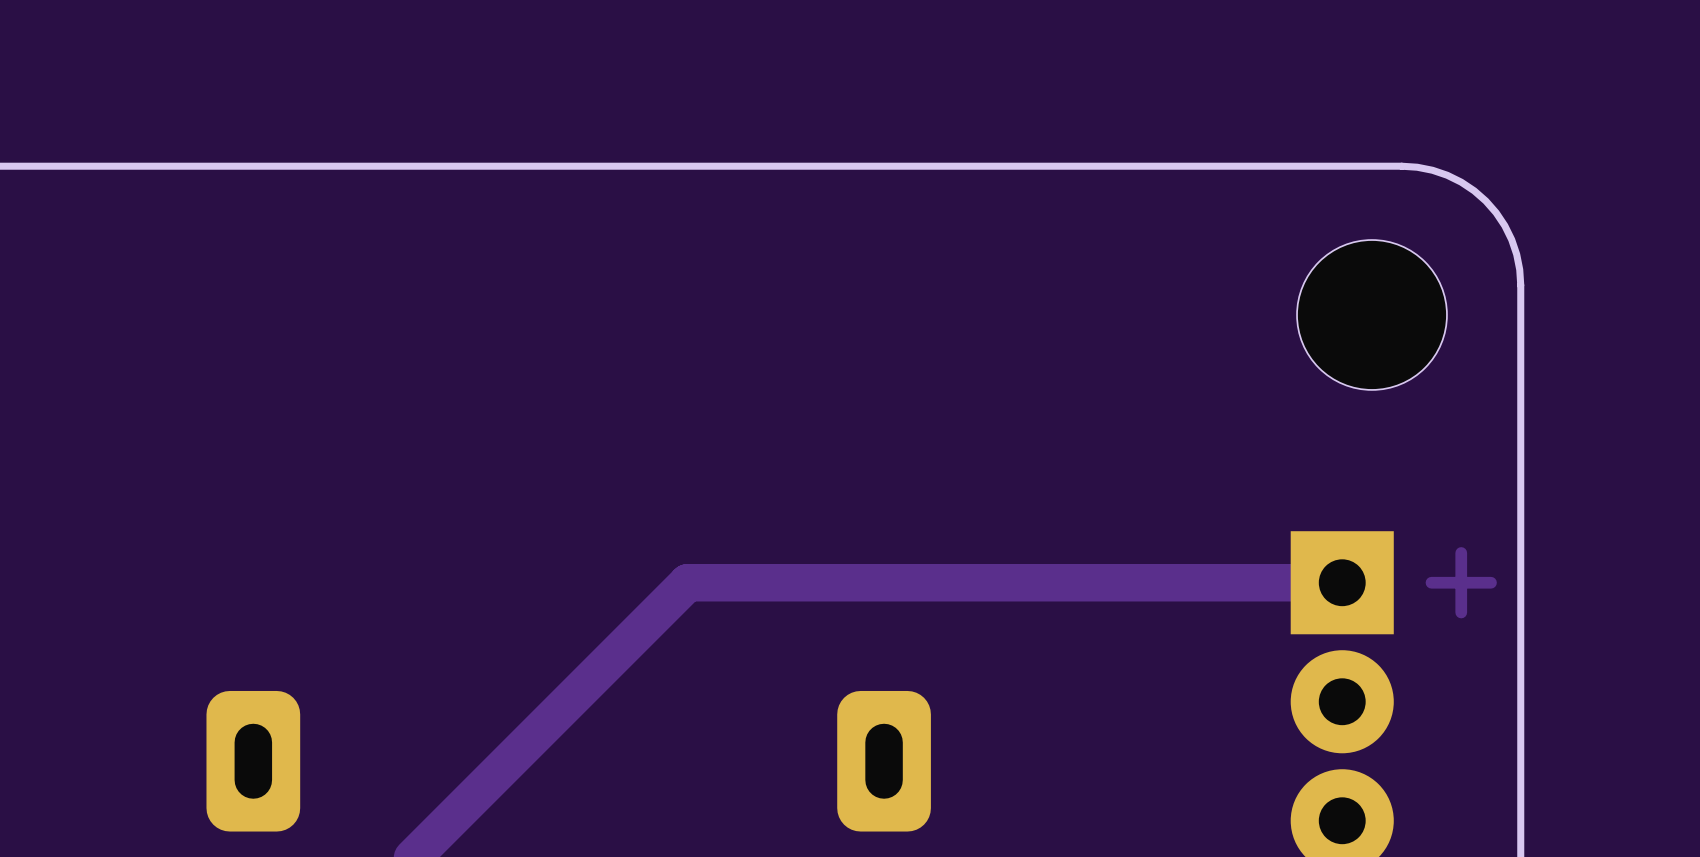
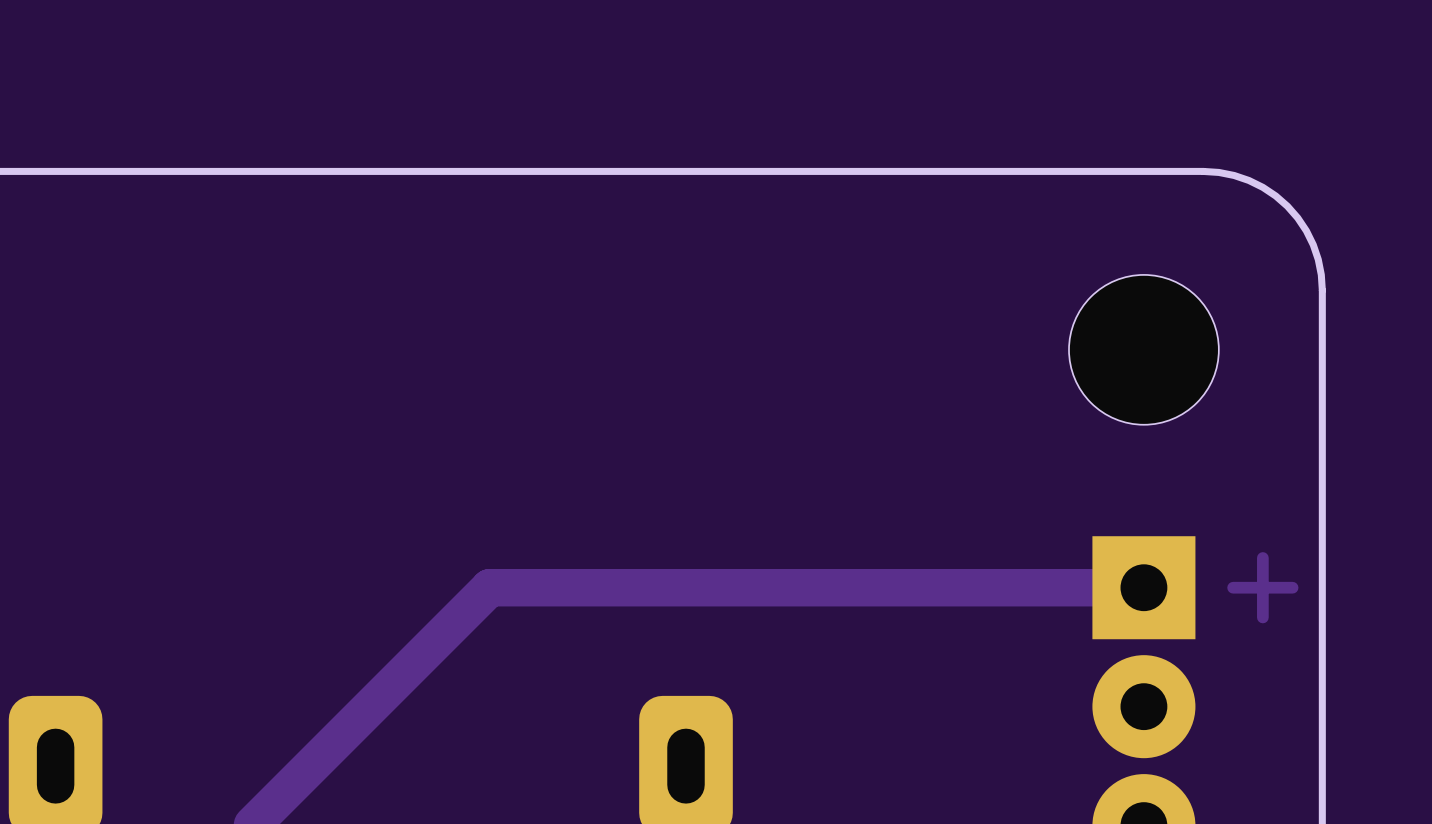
part position: (1371, 314) -> (1143, 349)

